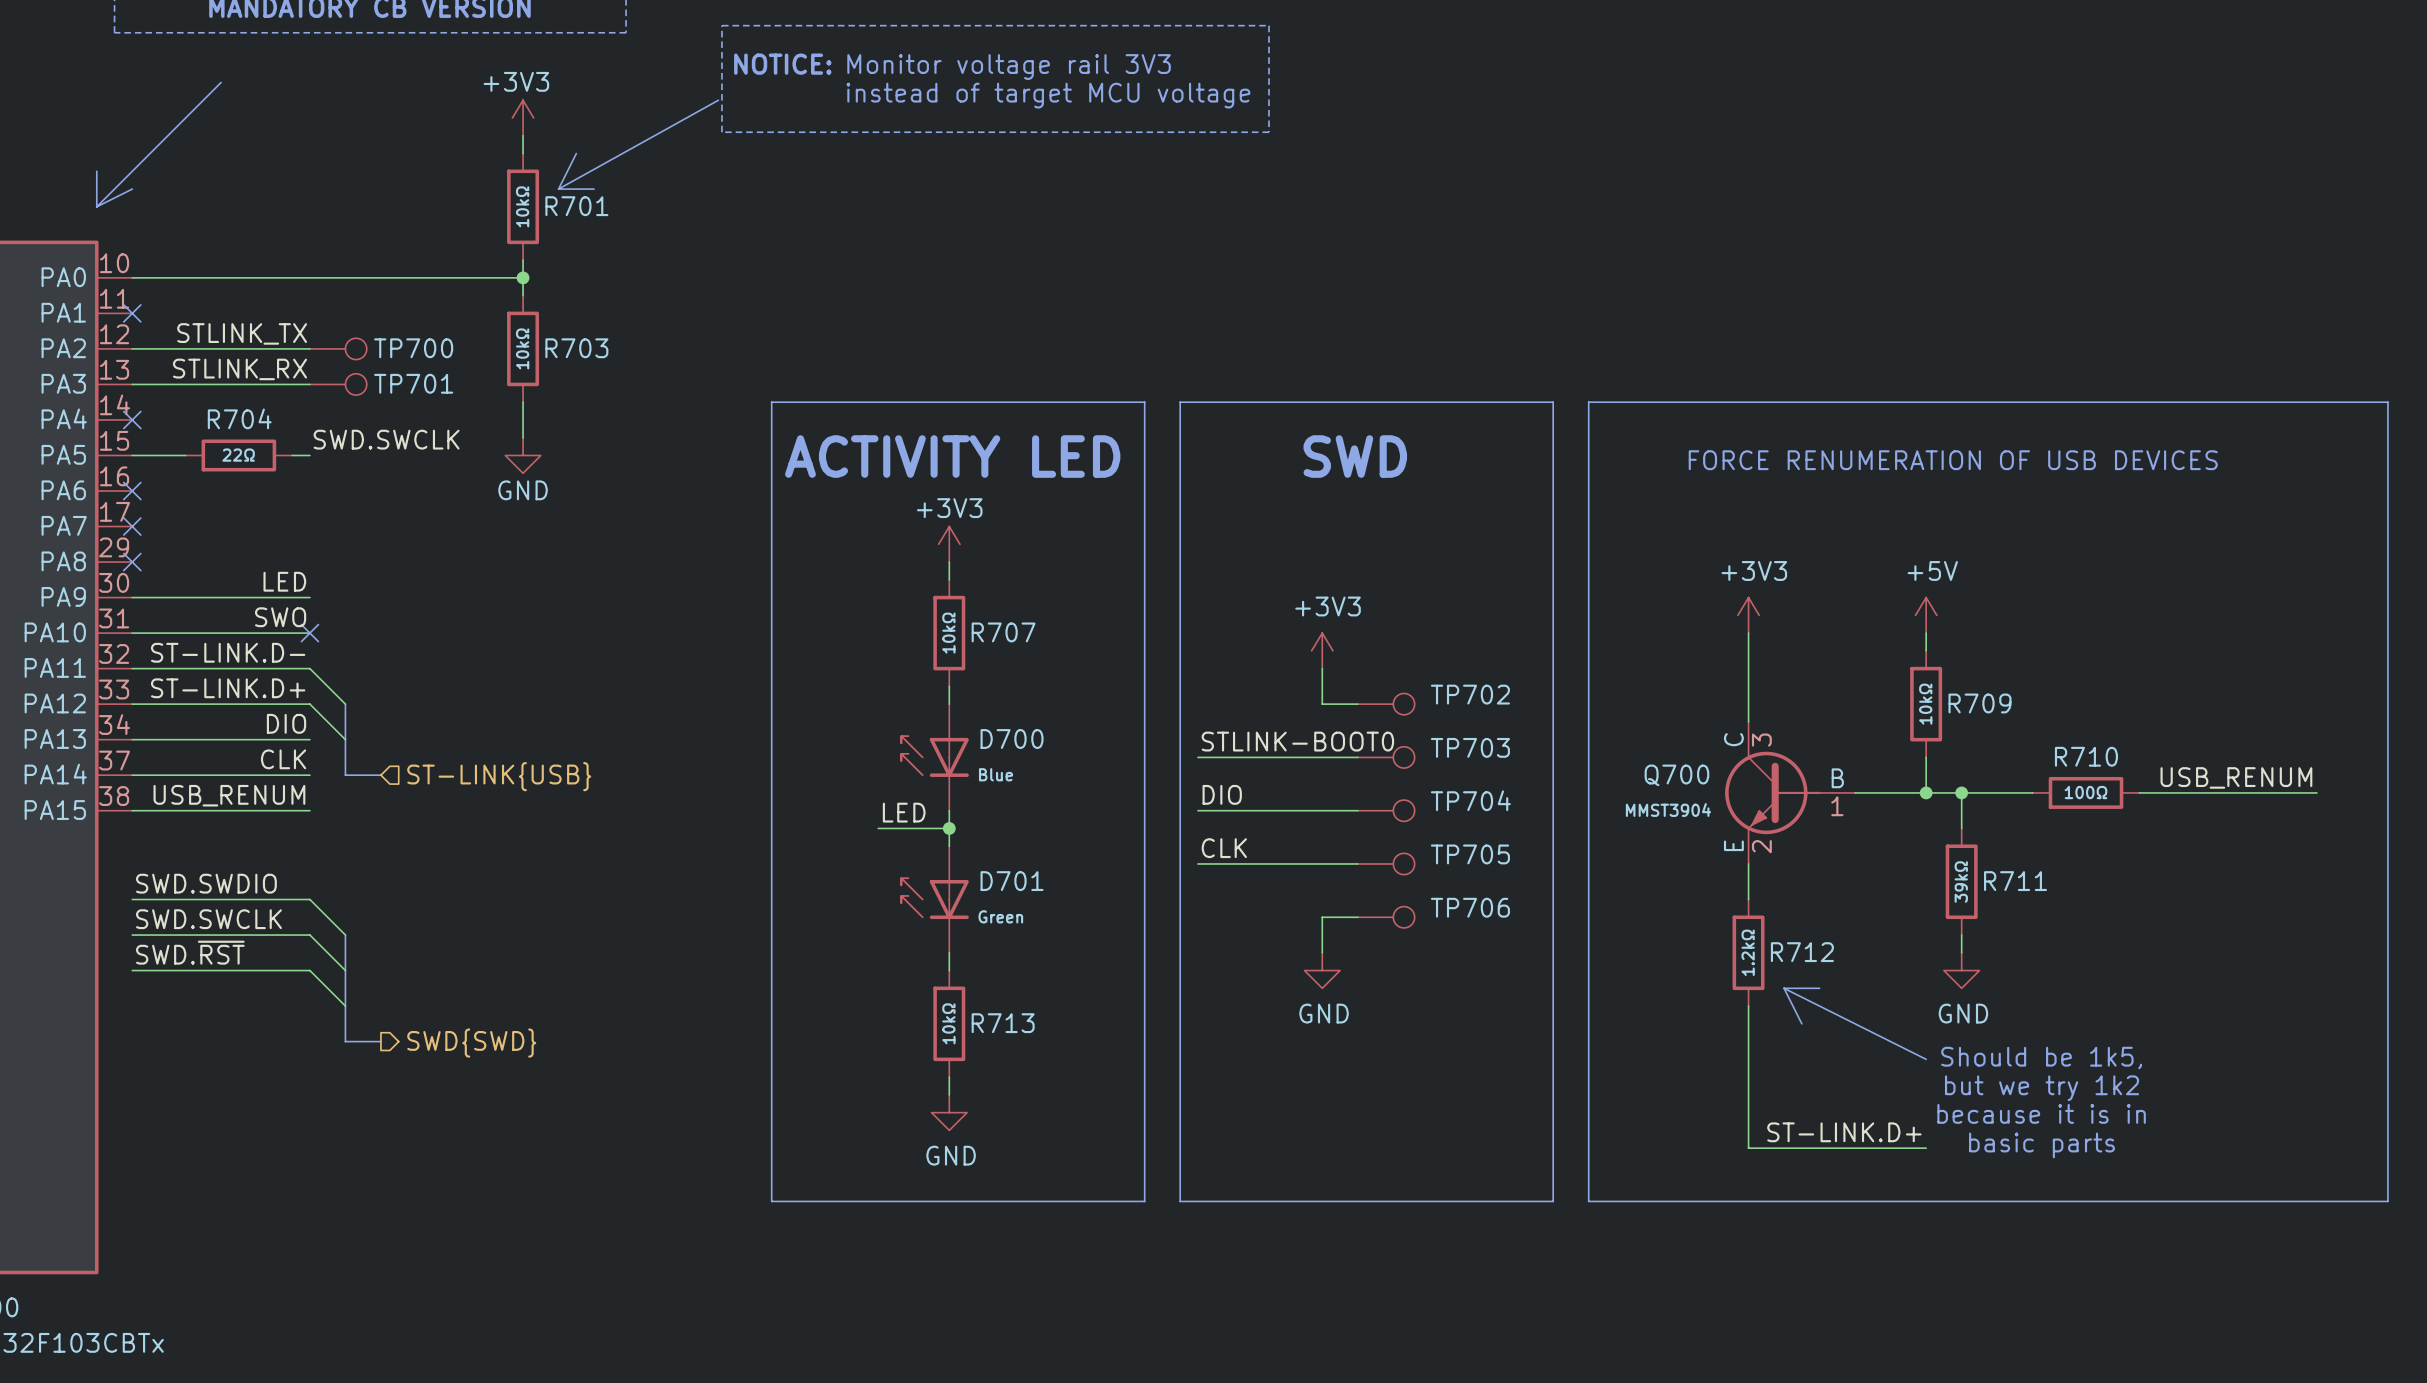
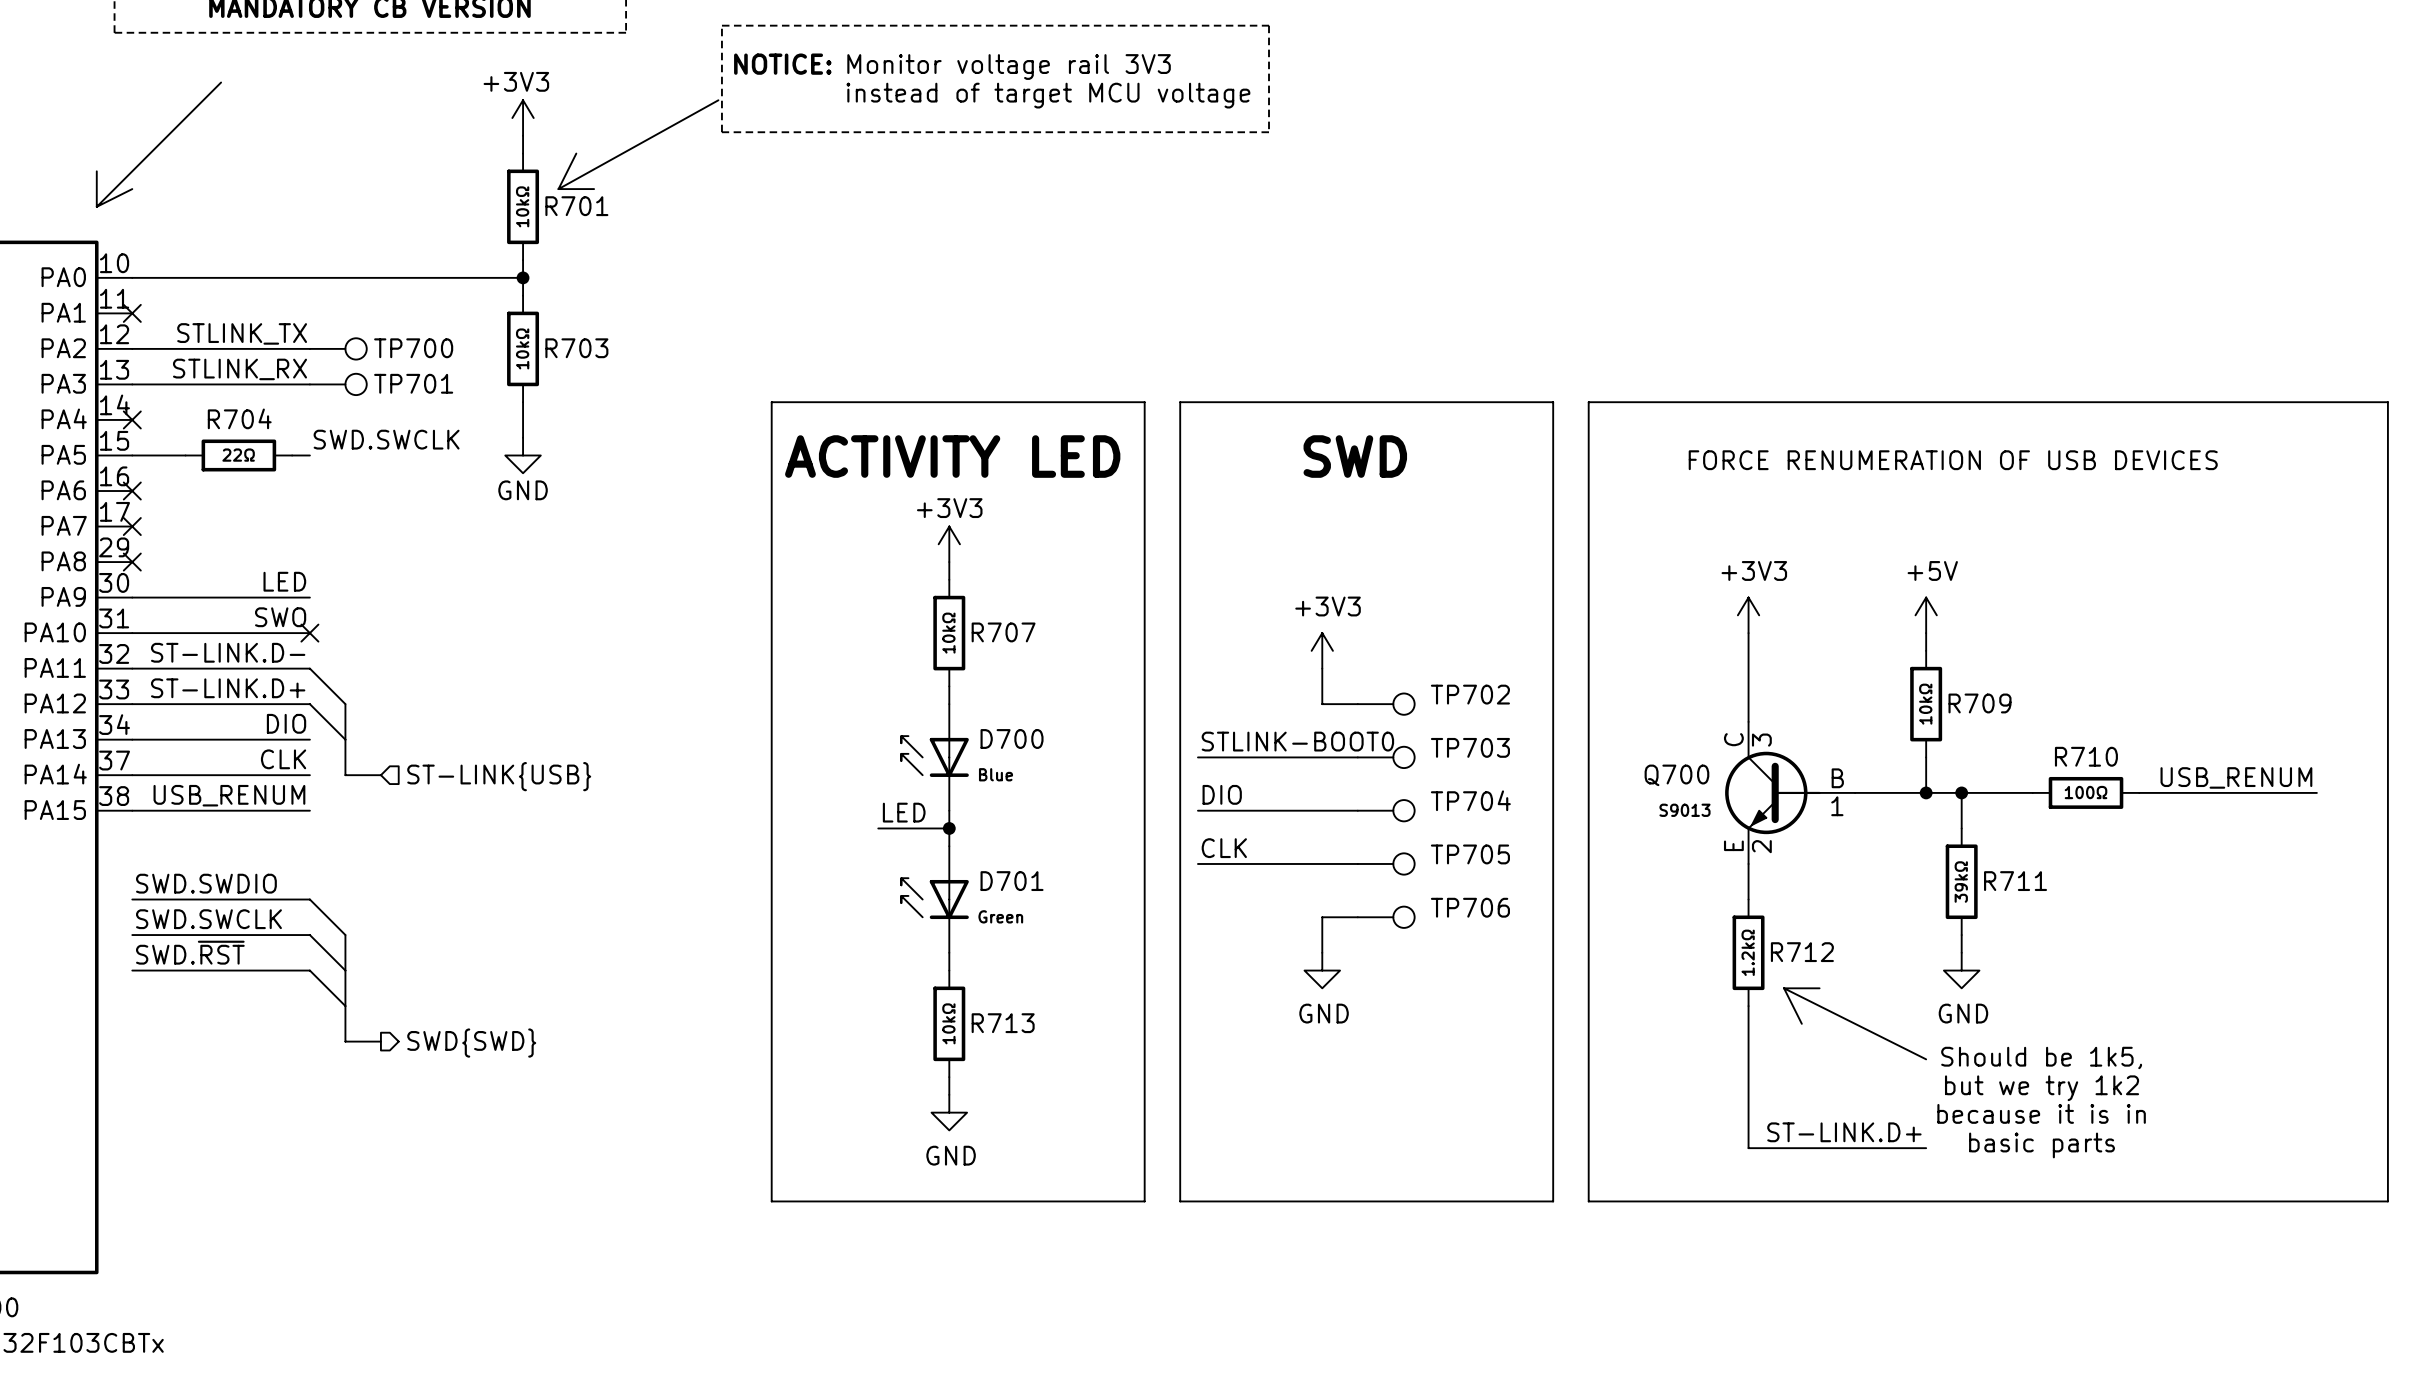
Q700 value: MMST3904 (1668, 810) -> S9013 (1684, 810)

